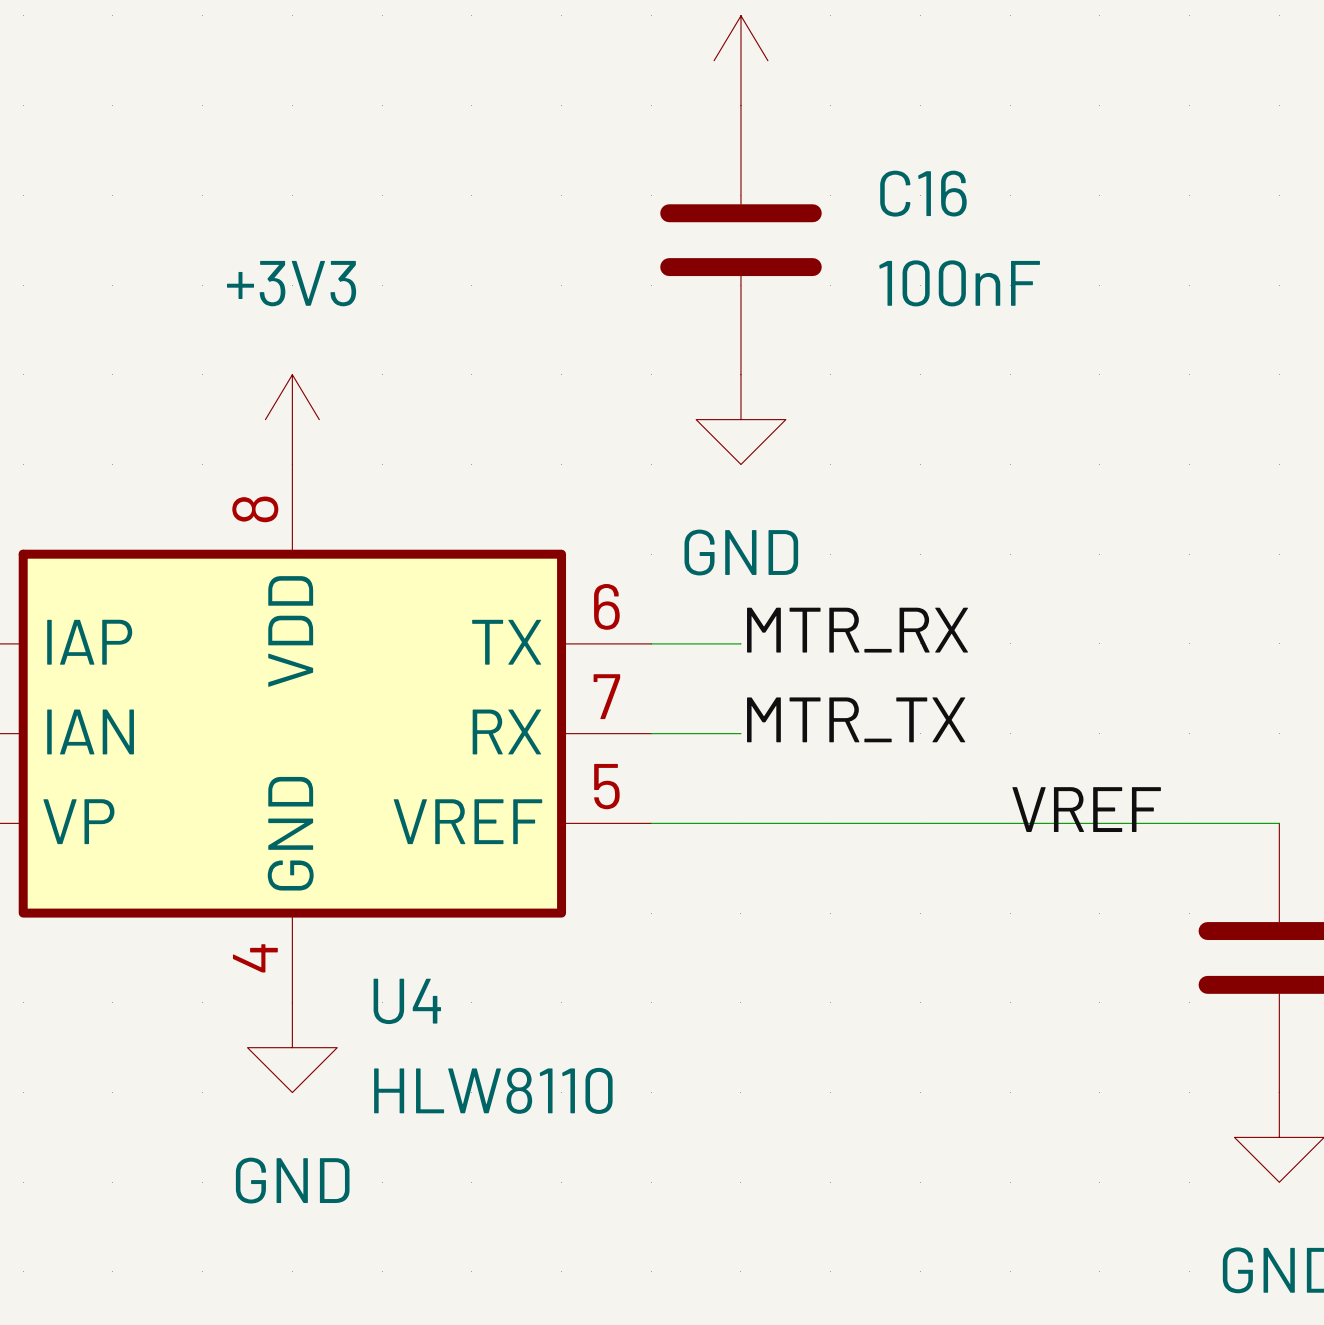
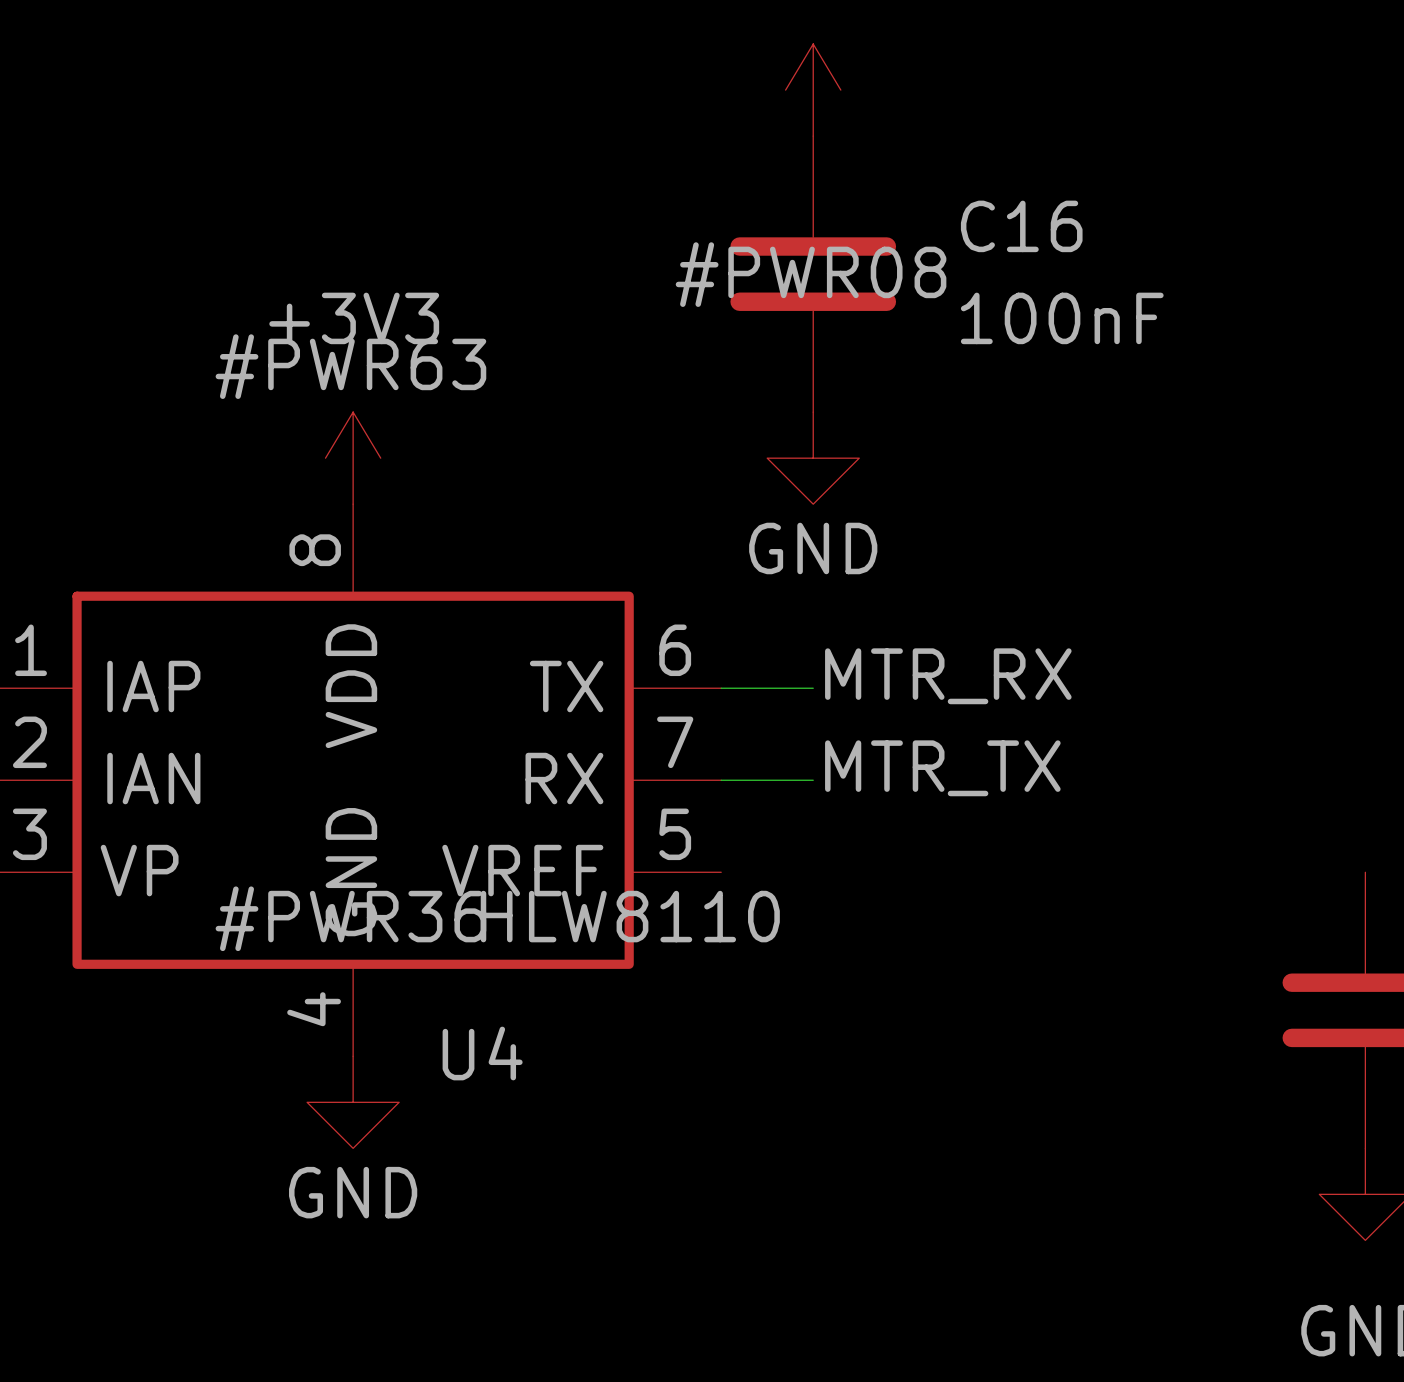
#PWR08 name: none -> #PWR08 (811, 274)
#PWR63 name: none -> #PWR63 (350, 366)
#PWR08 text position: GND (741, 552) -> GND (813, 548)
label: VREF (1086, 809) -> none
wire: (651, 823) (1279, 823) -> none
#PWR36 name: none -> #PWR36 (350, 918)
U4 value position: HLW8110 (493, 1090) -> HLW8110 (630, 916)
#PWR36 text position: GND (292, 1180) -> GND (353, 1192)

